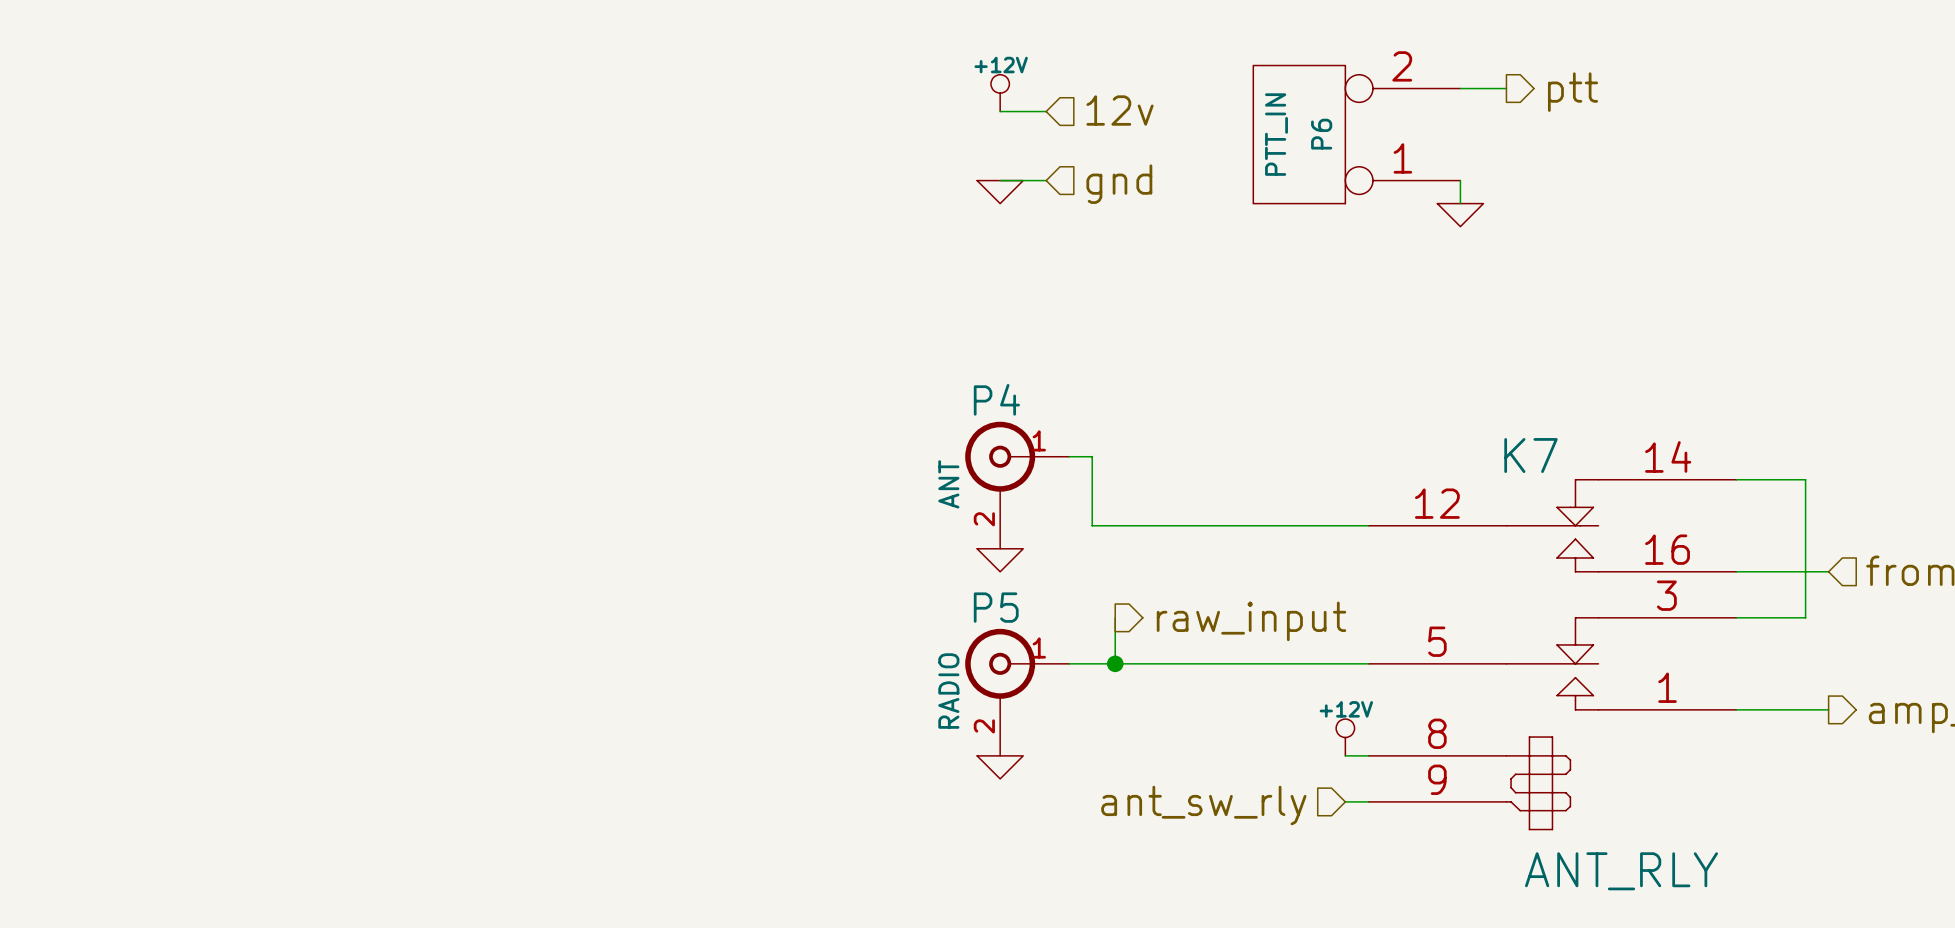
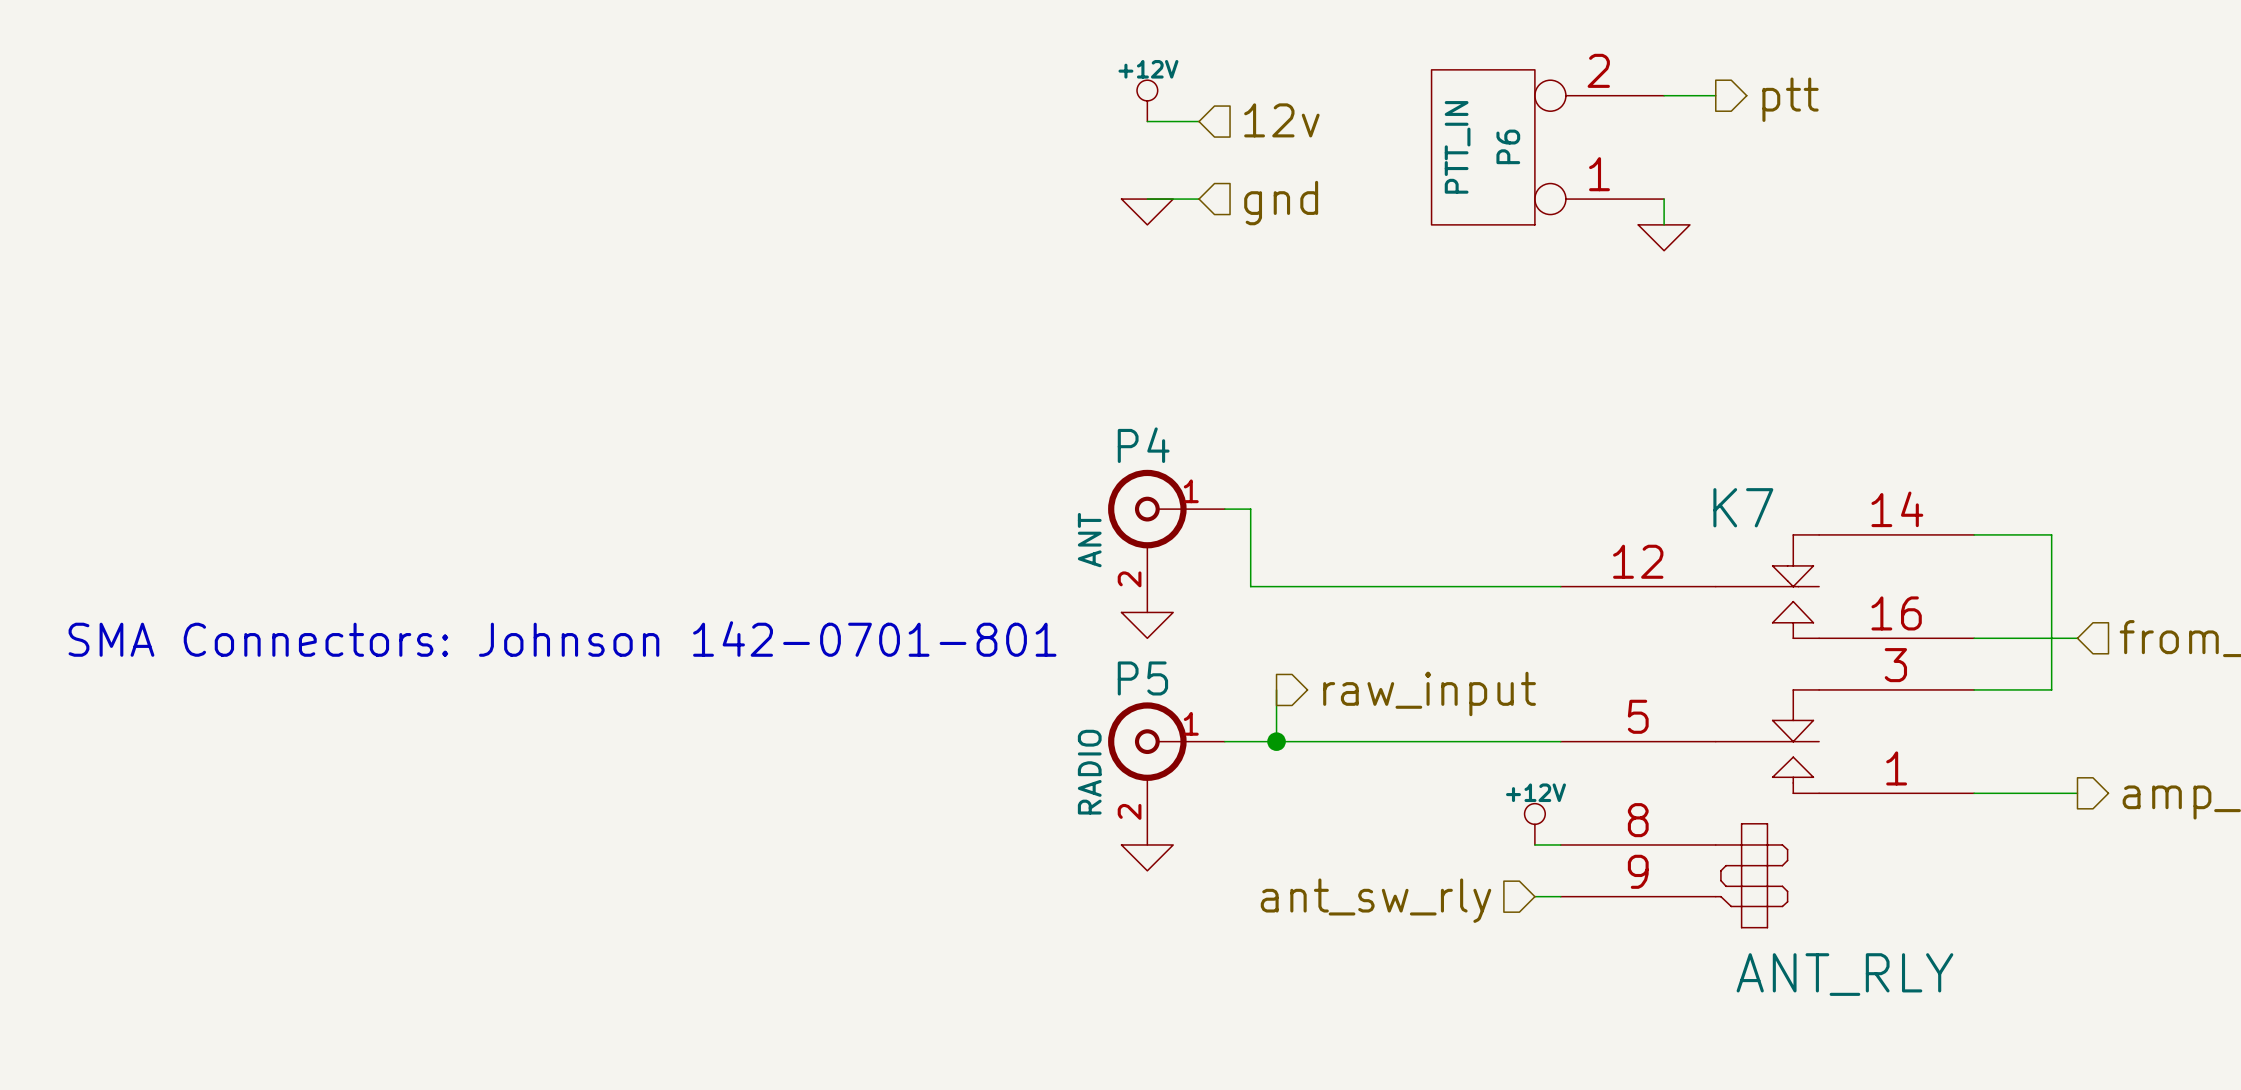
text: none -> SMA Connectors: Johnson 142-0701-801 (562, 639)

